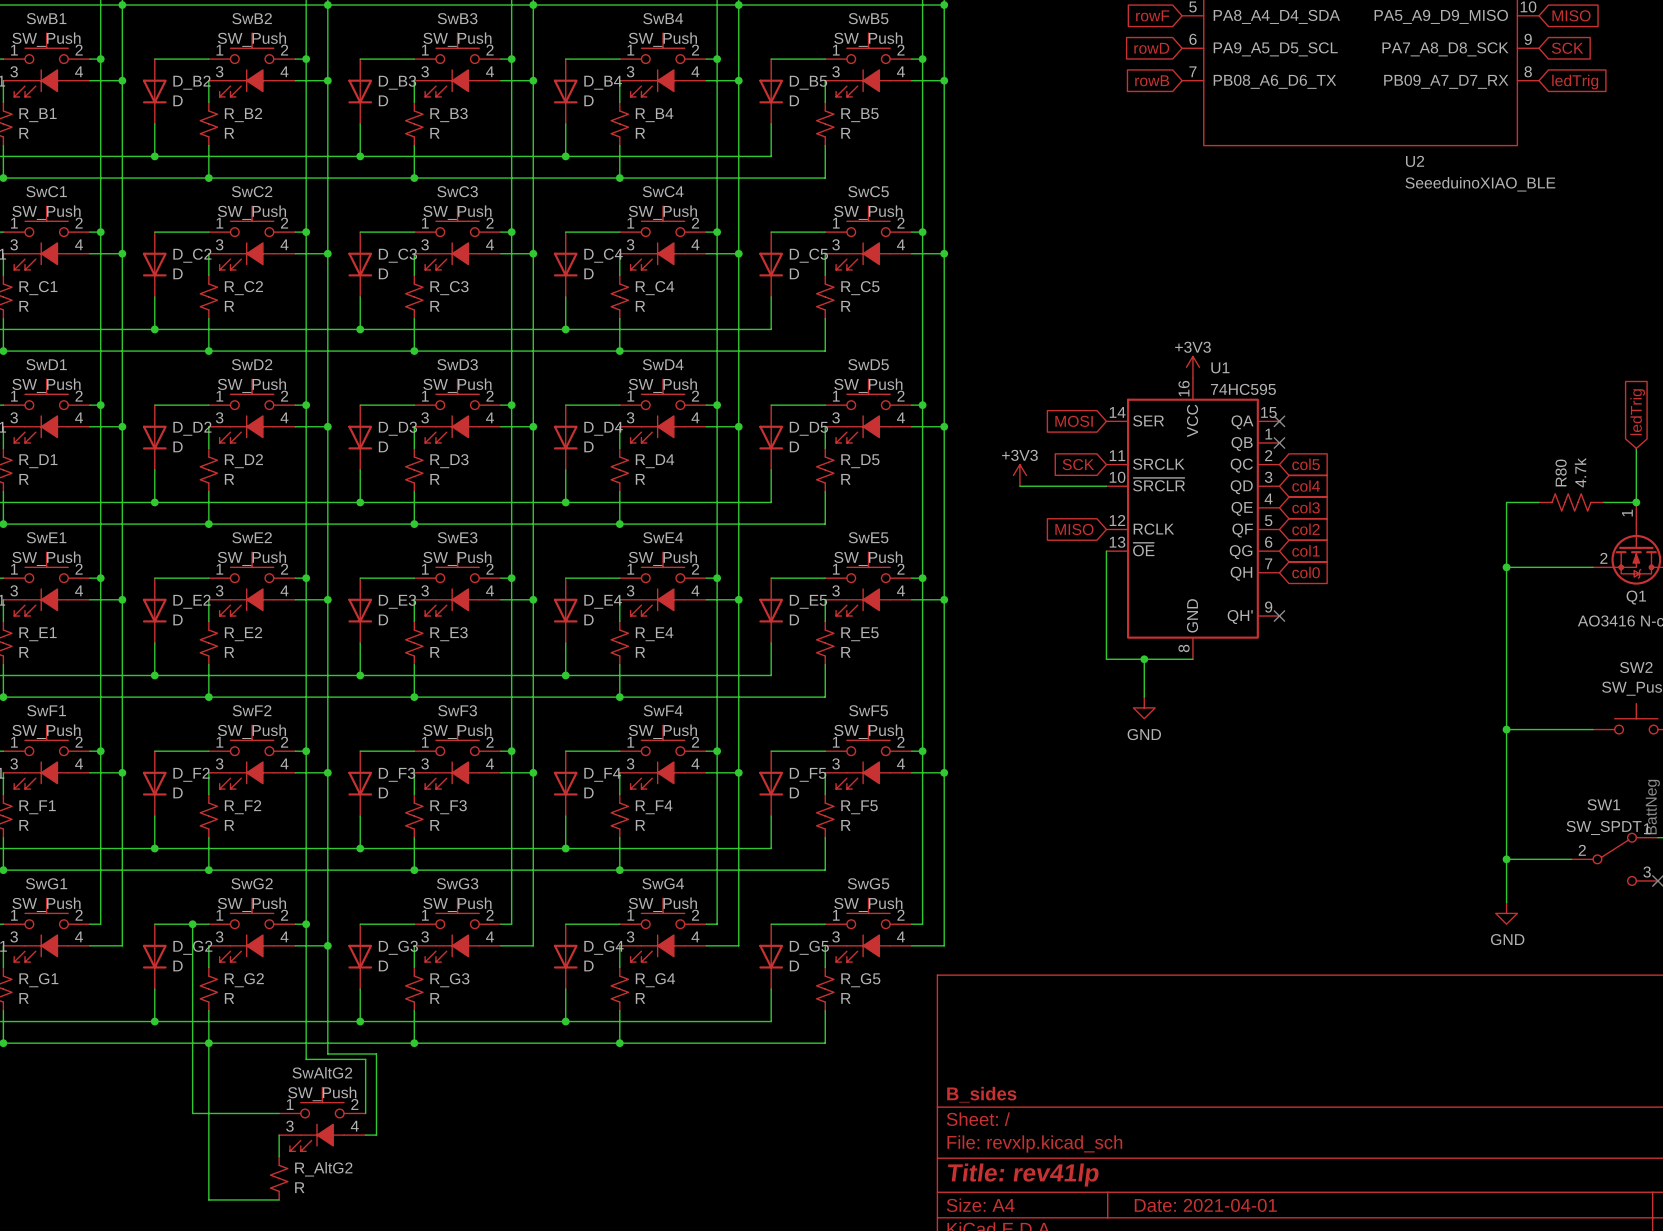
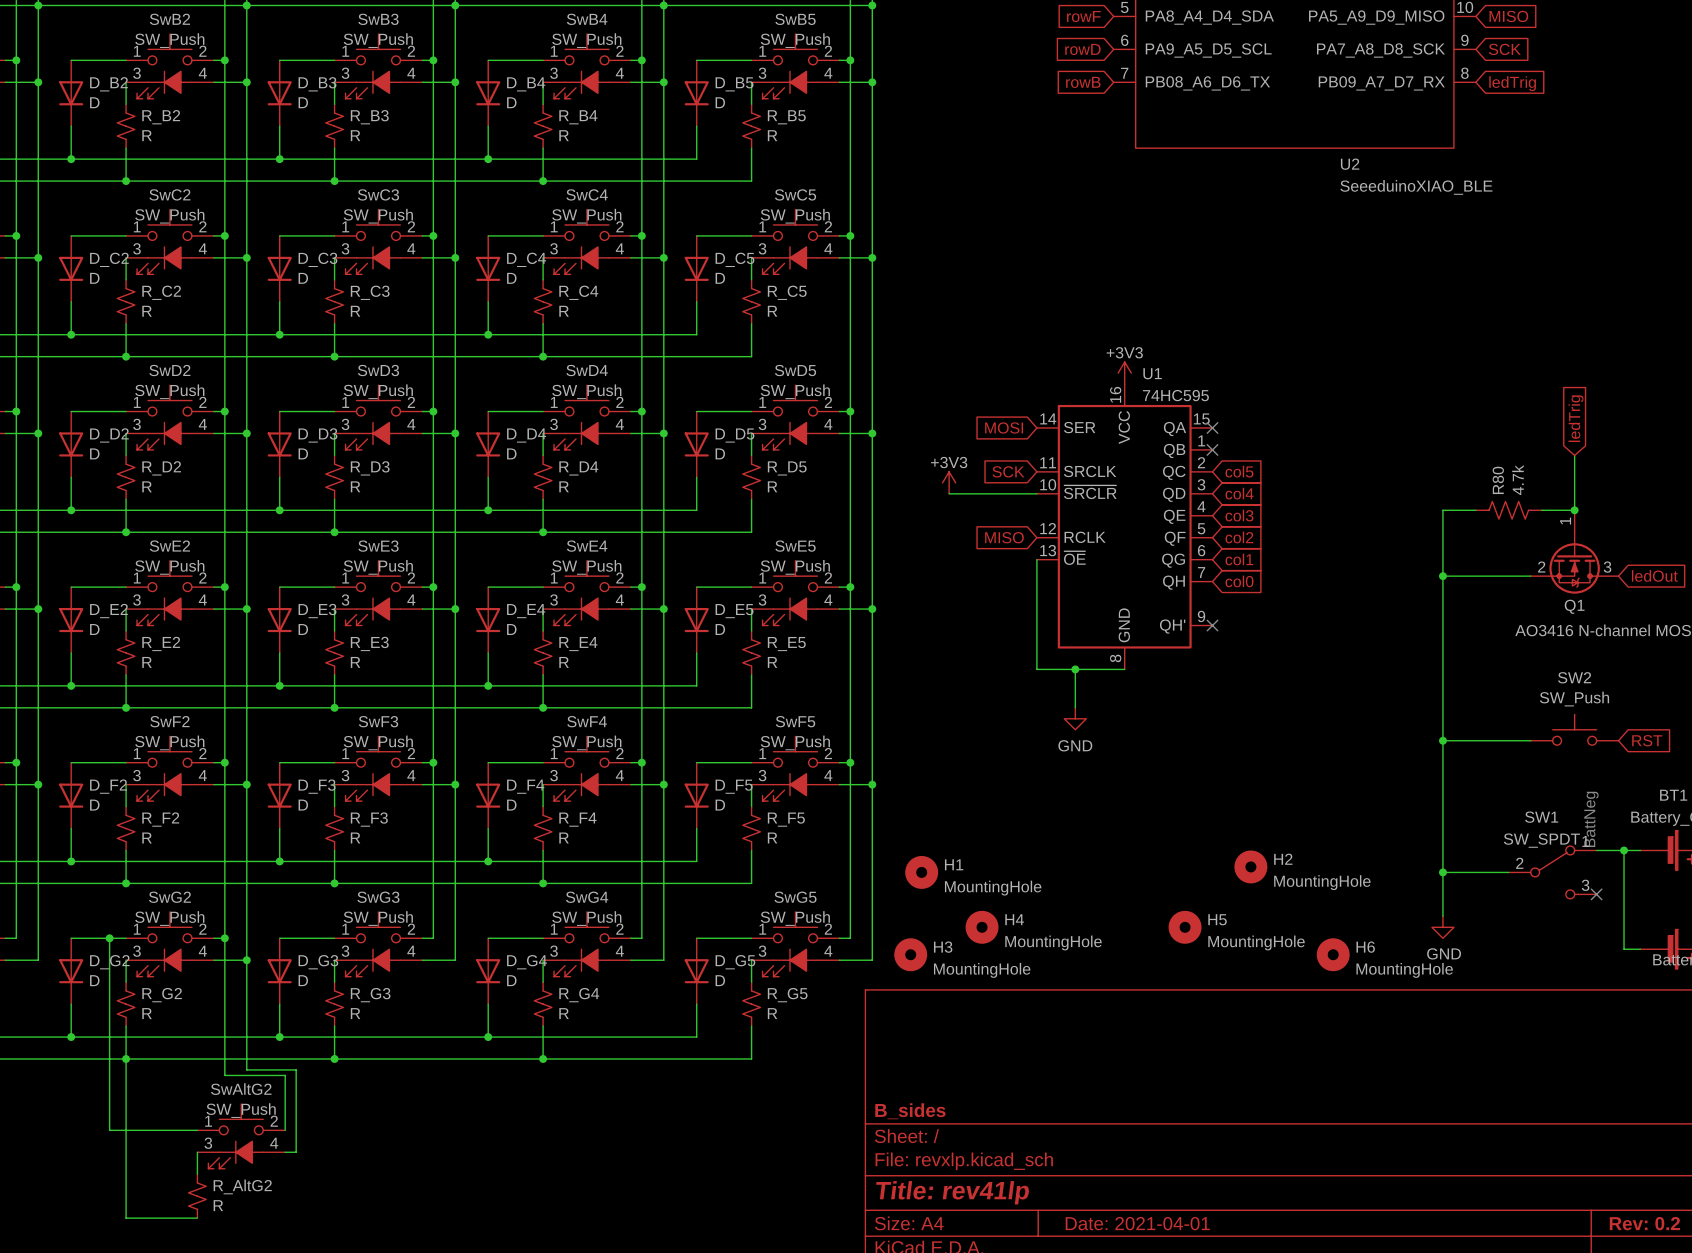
H2: none -> MountingHole (1250, 866)
H1: none -> MountingHole (921, 872)
H4: none -> MountingHole (982, 927)
H5: none -> MountingHole (1185, 927)
H3: none -> MountingHole (910, 954)
H6: none -> MountingHole (1333, 954)

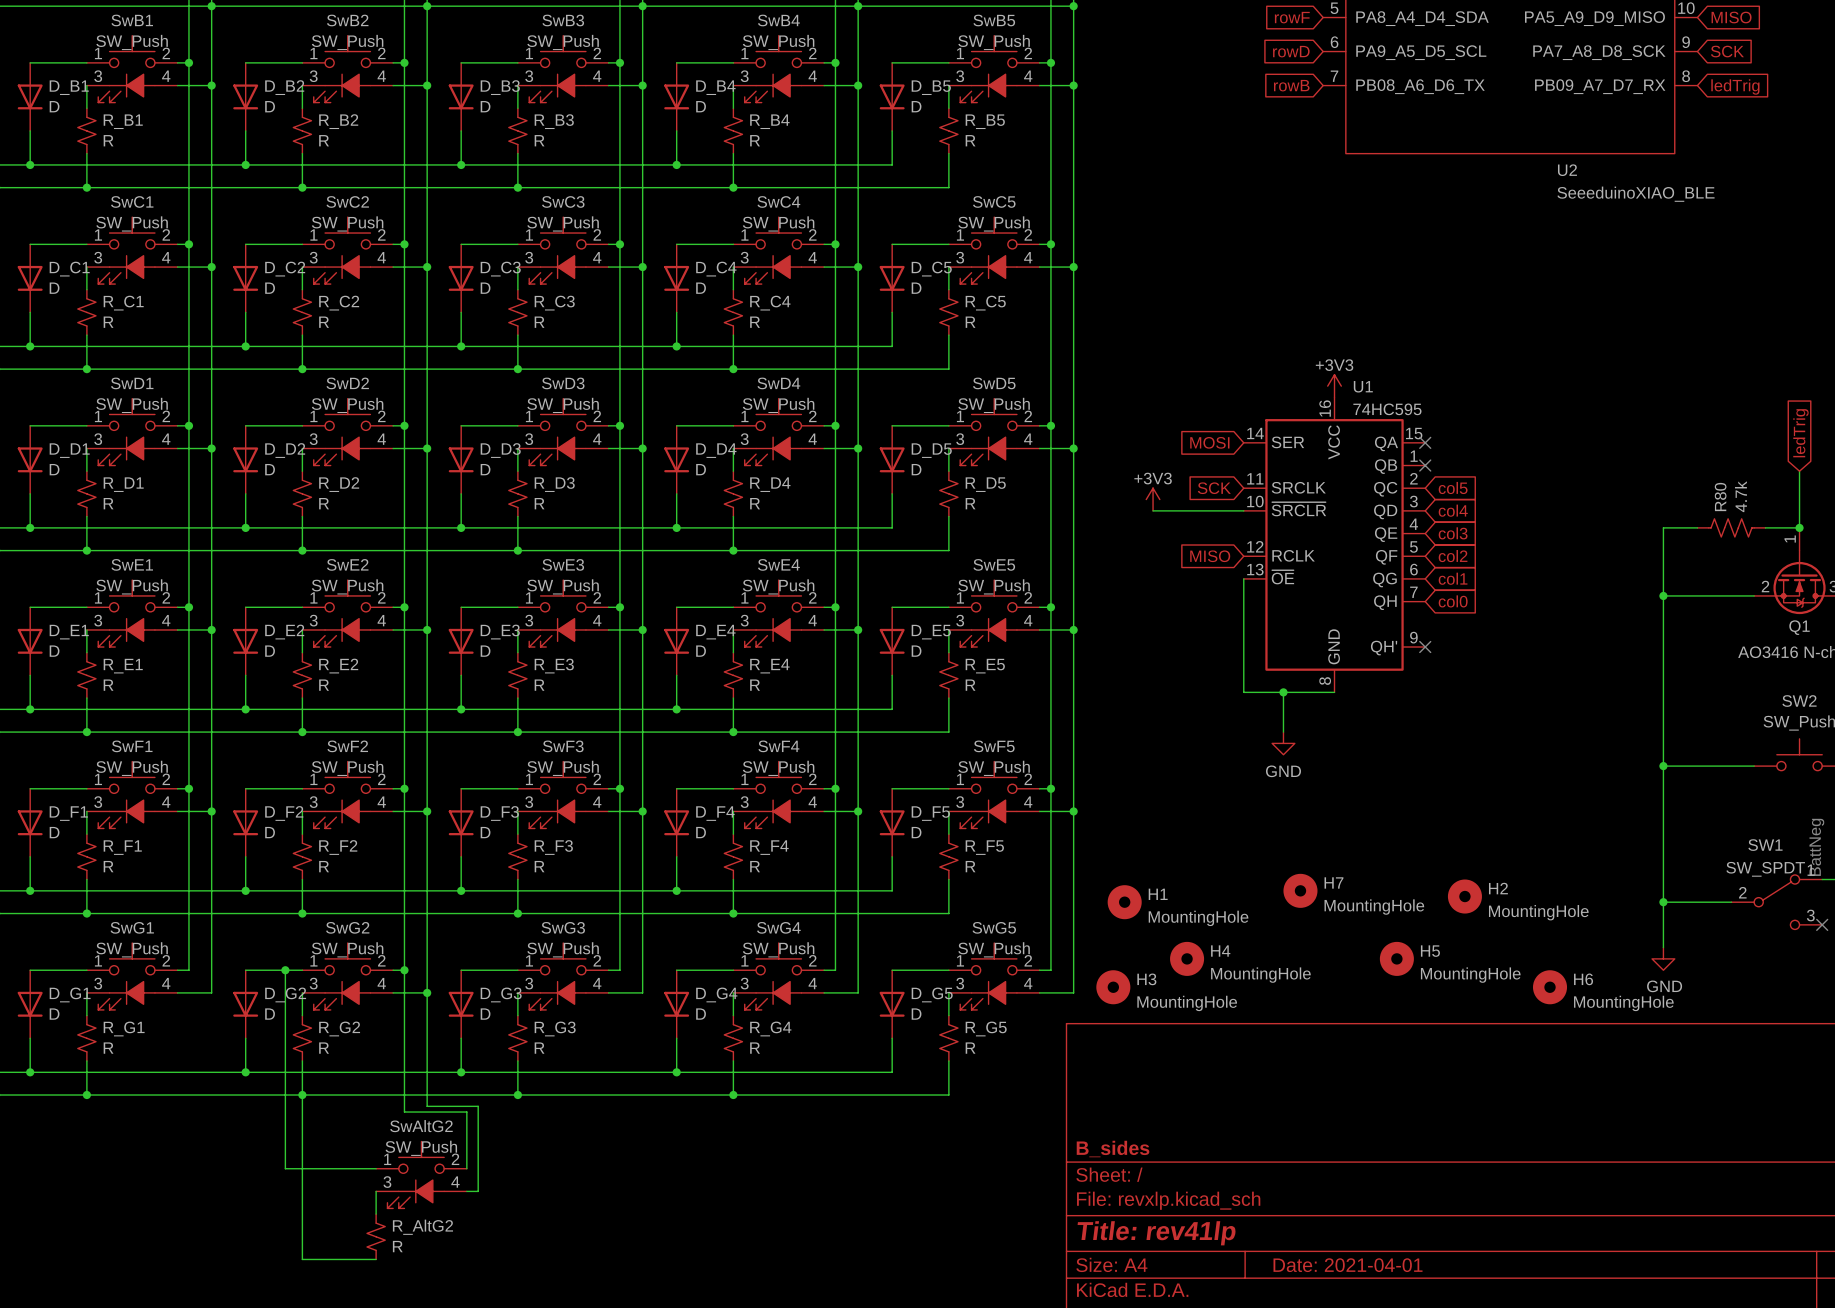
H7: none -> MountingHole (1300, 890)

